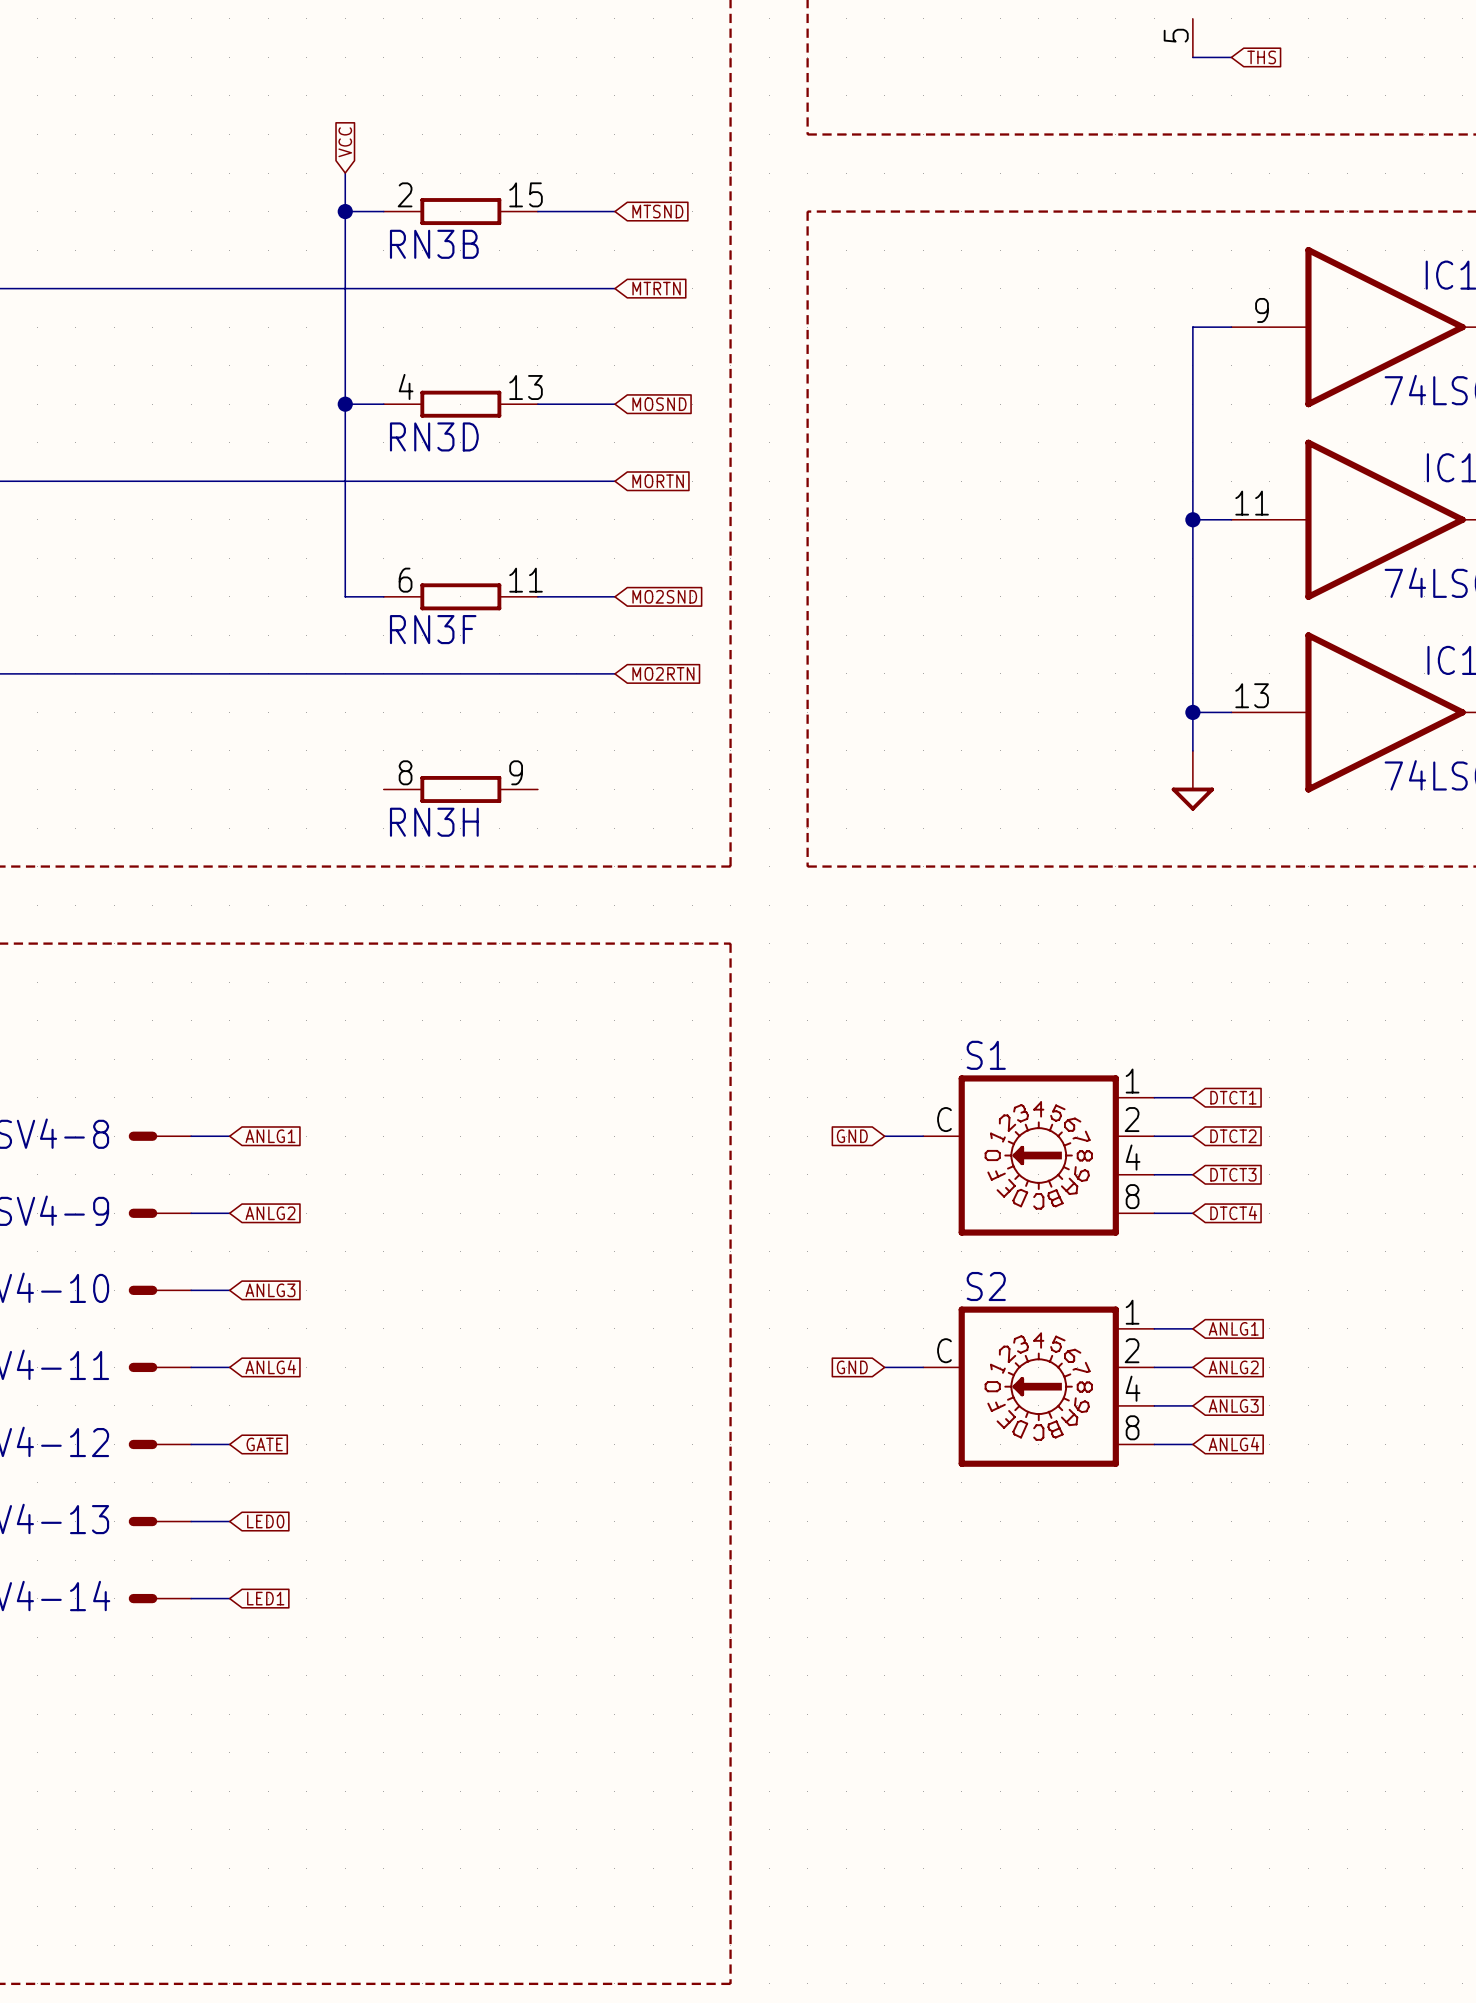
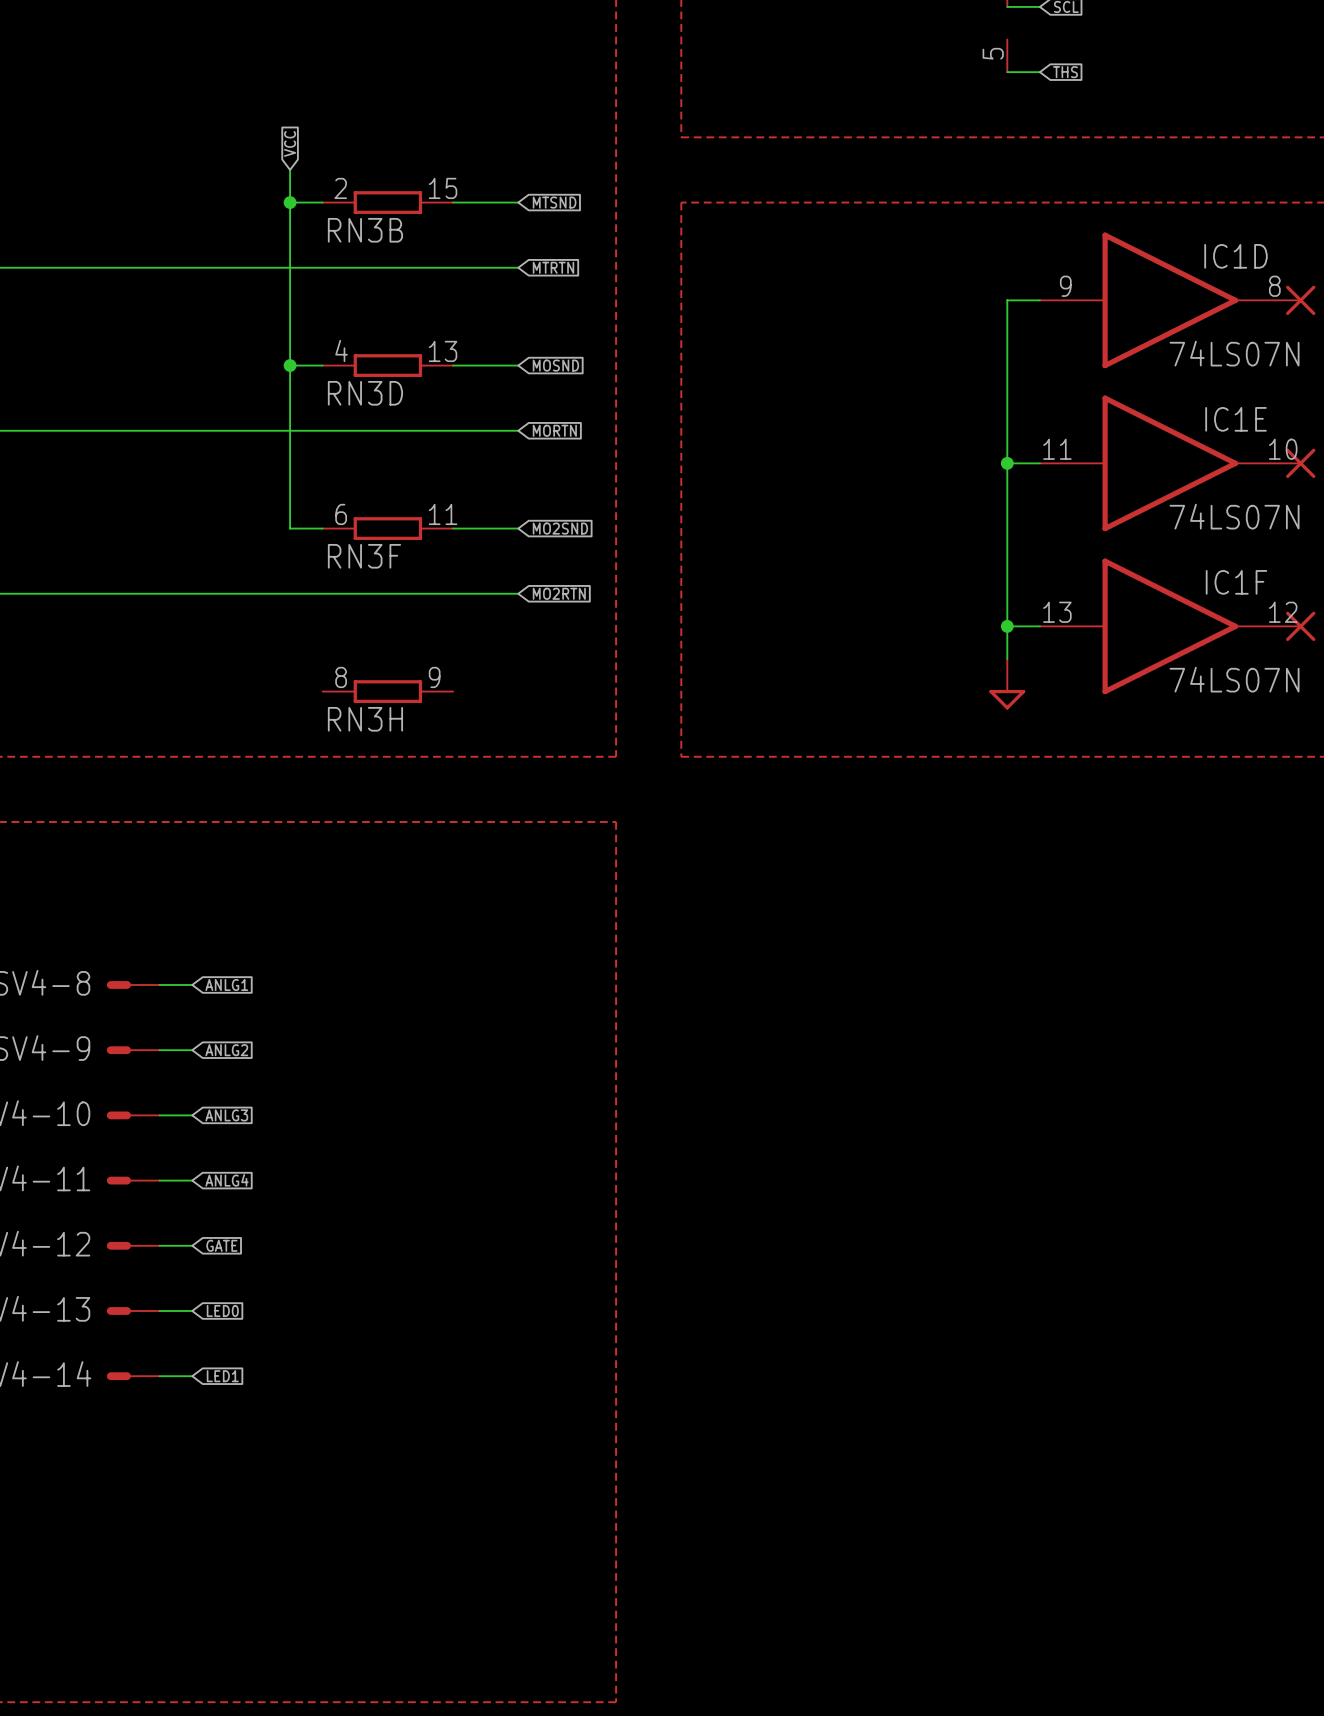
wire: (1154, 1097) (1192, 1097) -> none
global label: DTCT1 (1233, 1097) -> none
global label: GND (852, 1136) -> none
wire: (884, 1136) (923, 1136) -> none
wire: (1154, 1136) (1192, 1136) -> none
global label: DTCT2 (1233, 1136) -> none
S1: (1038, 1155) -> none
wire: (1154, 1174) (1192, 1174) -> none
global label: DTCT3 (1233, 1174) -> none
wire: (1154, 1213) (1192, 1213) -> none
global label: DTCT4 (1233, 1213) -> none
wire: (1154, 1328) (1192, 1328) -> none
global label: ANLG1 (1233, 1328) -> none
global label: GND (852, 1367) -> none
wire: (884, 1367) (923, 1367) -> none
wire: (1154, 1367) (1192, 1367) -> none
global label: ANLG2 (1233, 1367) -> none
S2: (1038, 1386) -> none
wire: (1154, 1405) (1192, 1405) -> none
global label: ANLG3 (1233, 1405) -> none
wire: (1154, 1444) (1192, 1444) -> none
global label: ANLG4 (1233, 1444) -> none

